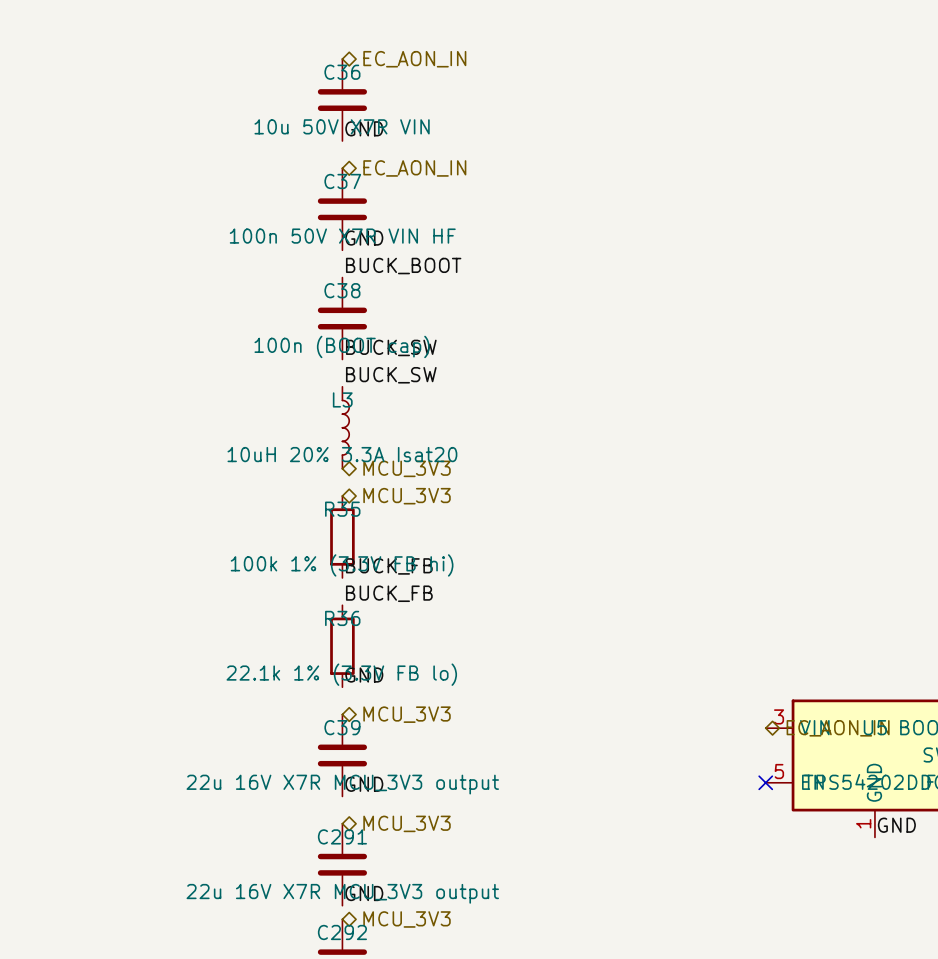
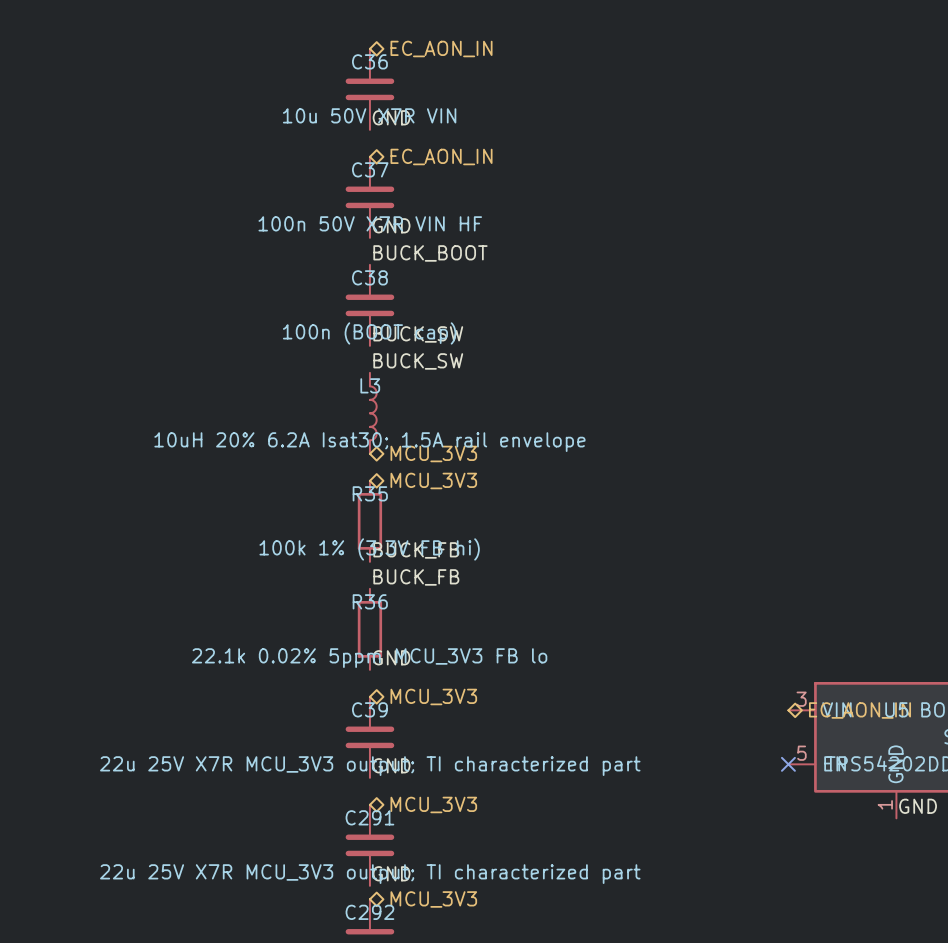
L3 value: 10uH 20% 3.3A Isat20 (342, 454) -> 10uH 20% 6.2A Isat30; 1.5A rail envelope (369, 442)
R36 value: 22.1k 1% (3.3V FB lo) (341, 674) -> 22.1k 0.02% 5ppm MCU_3V3 FB lo (369, 658)
C39 value: 22u 16V X7R MCU_3V3 output (342, 784) -> 22u 25V X7R MCU_3V3 output; TI characterized part (370, 766)
C291 value: 22u 16V X7R MCU_3V3 output (342, 893) -> 22u 25V X7R MCU_3V3 output; TI characterized part (370, 874)

